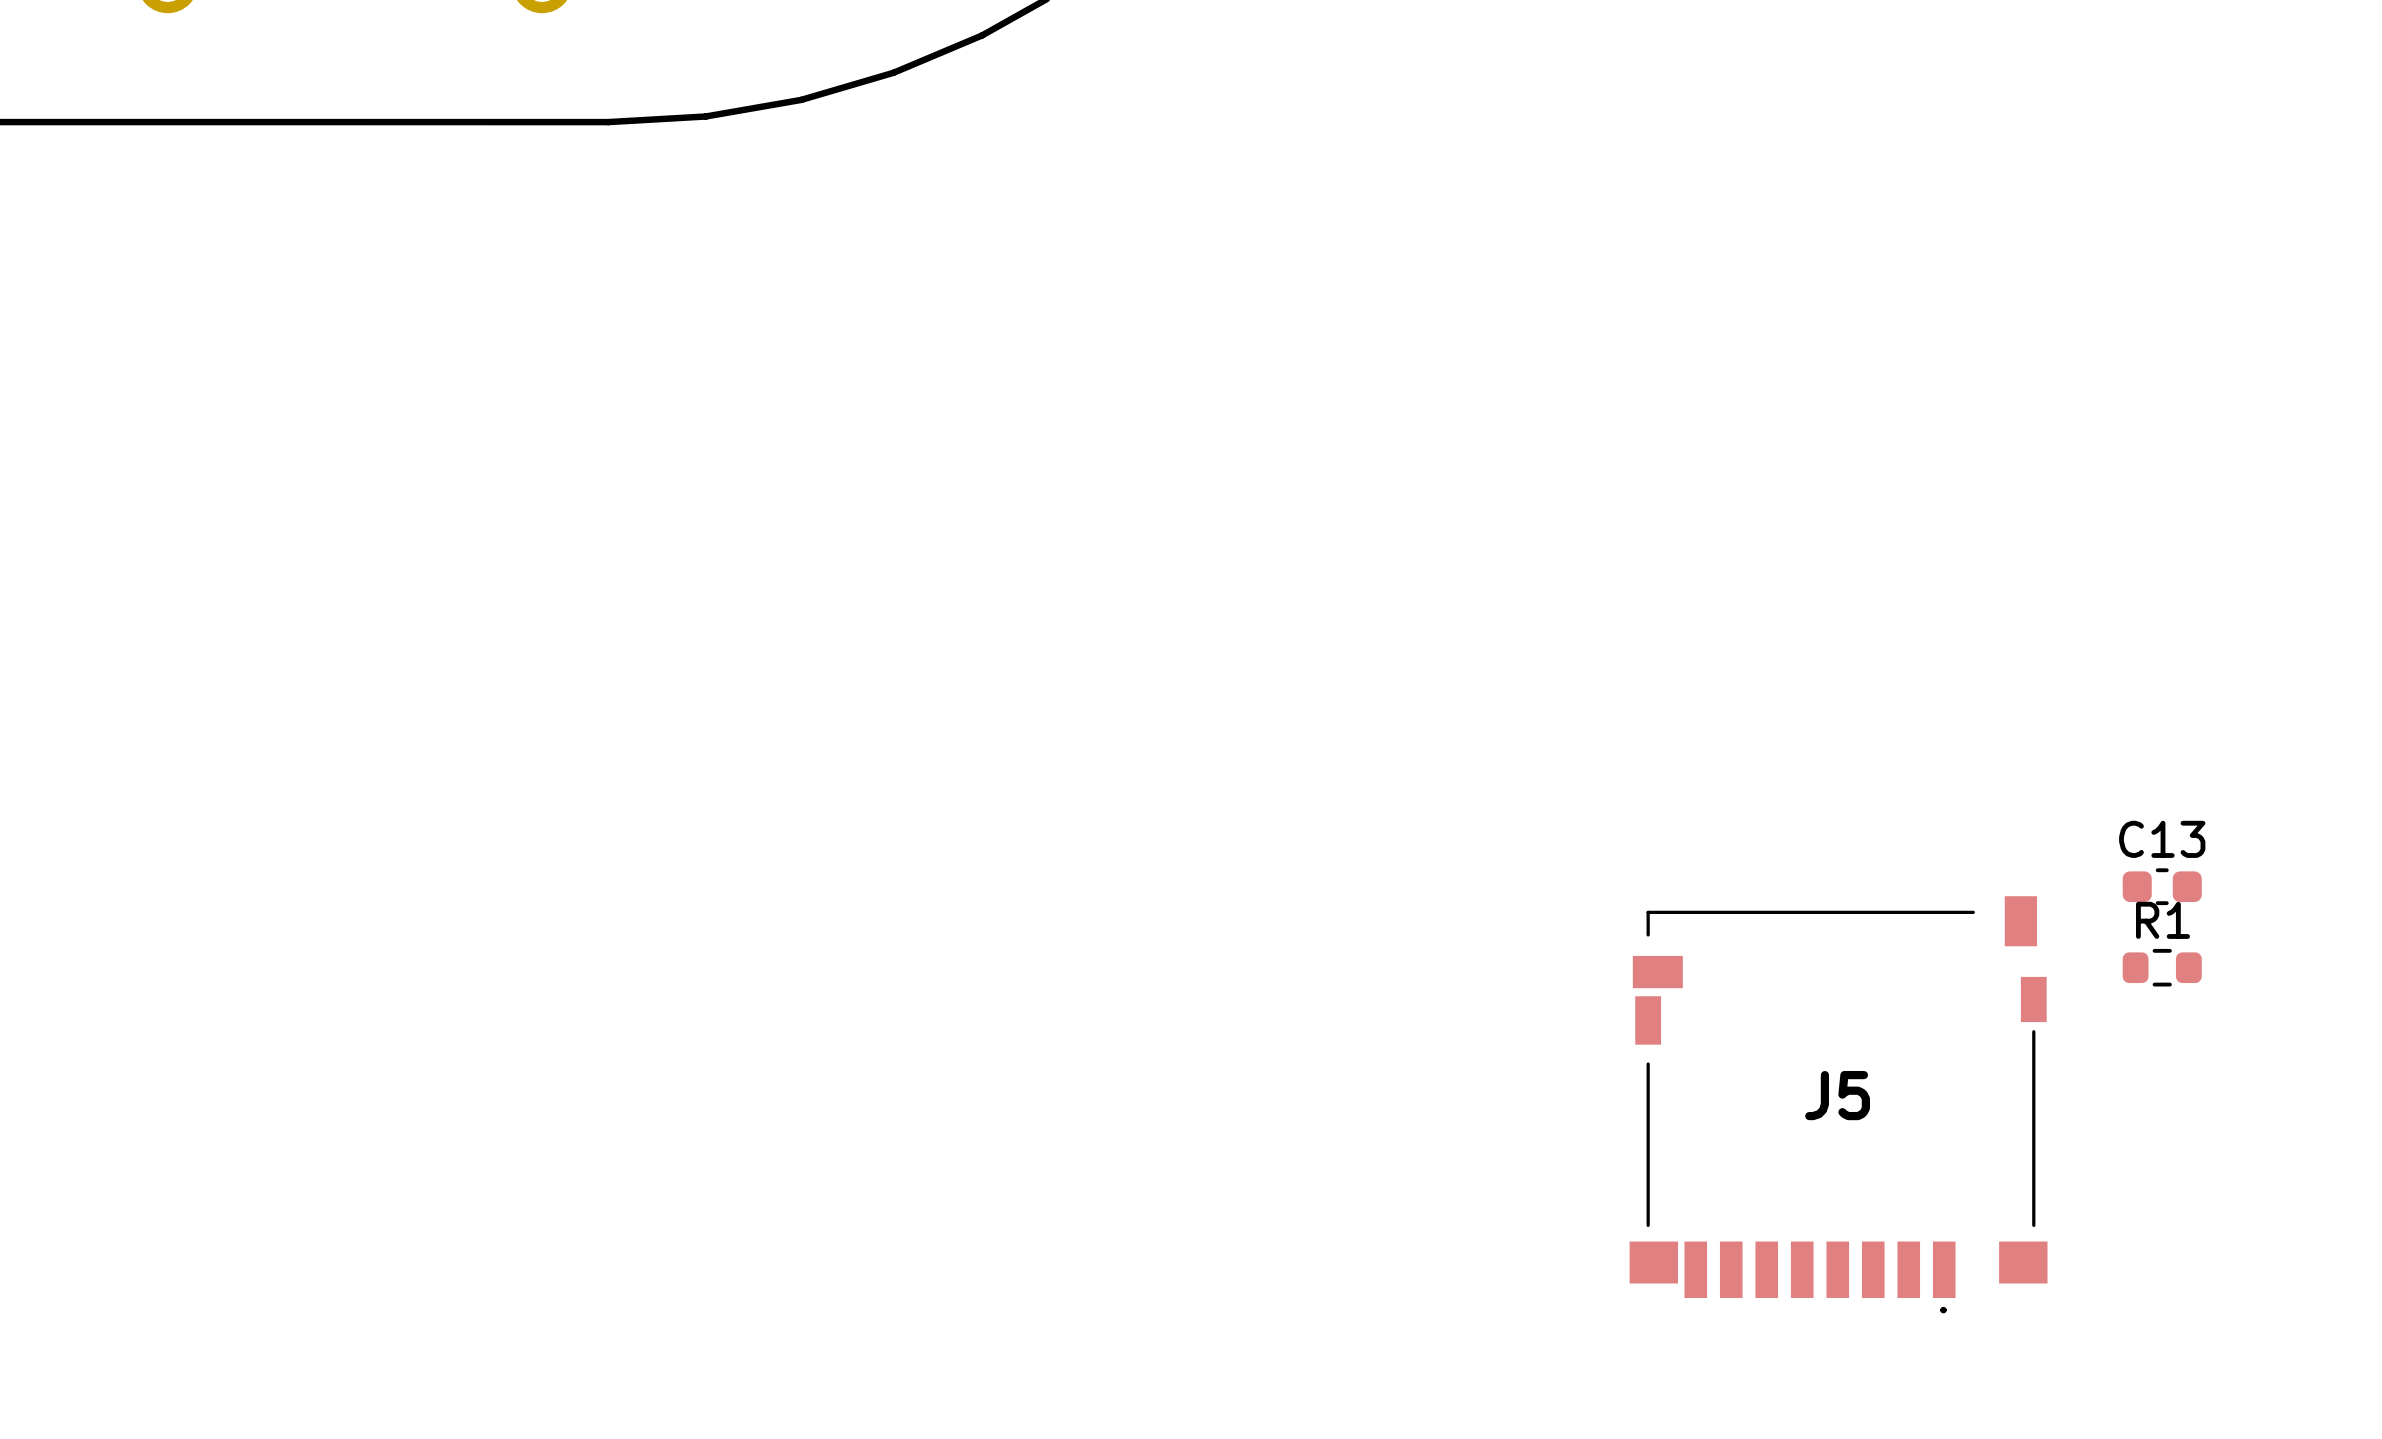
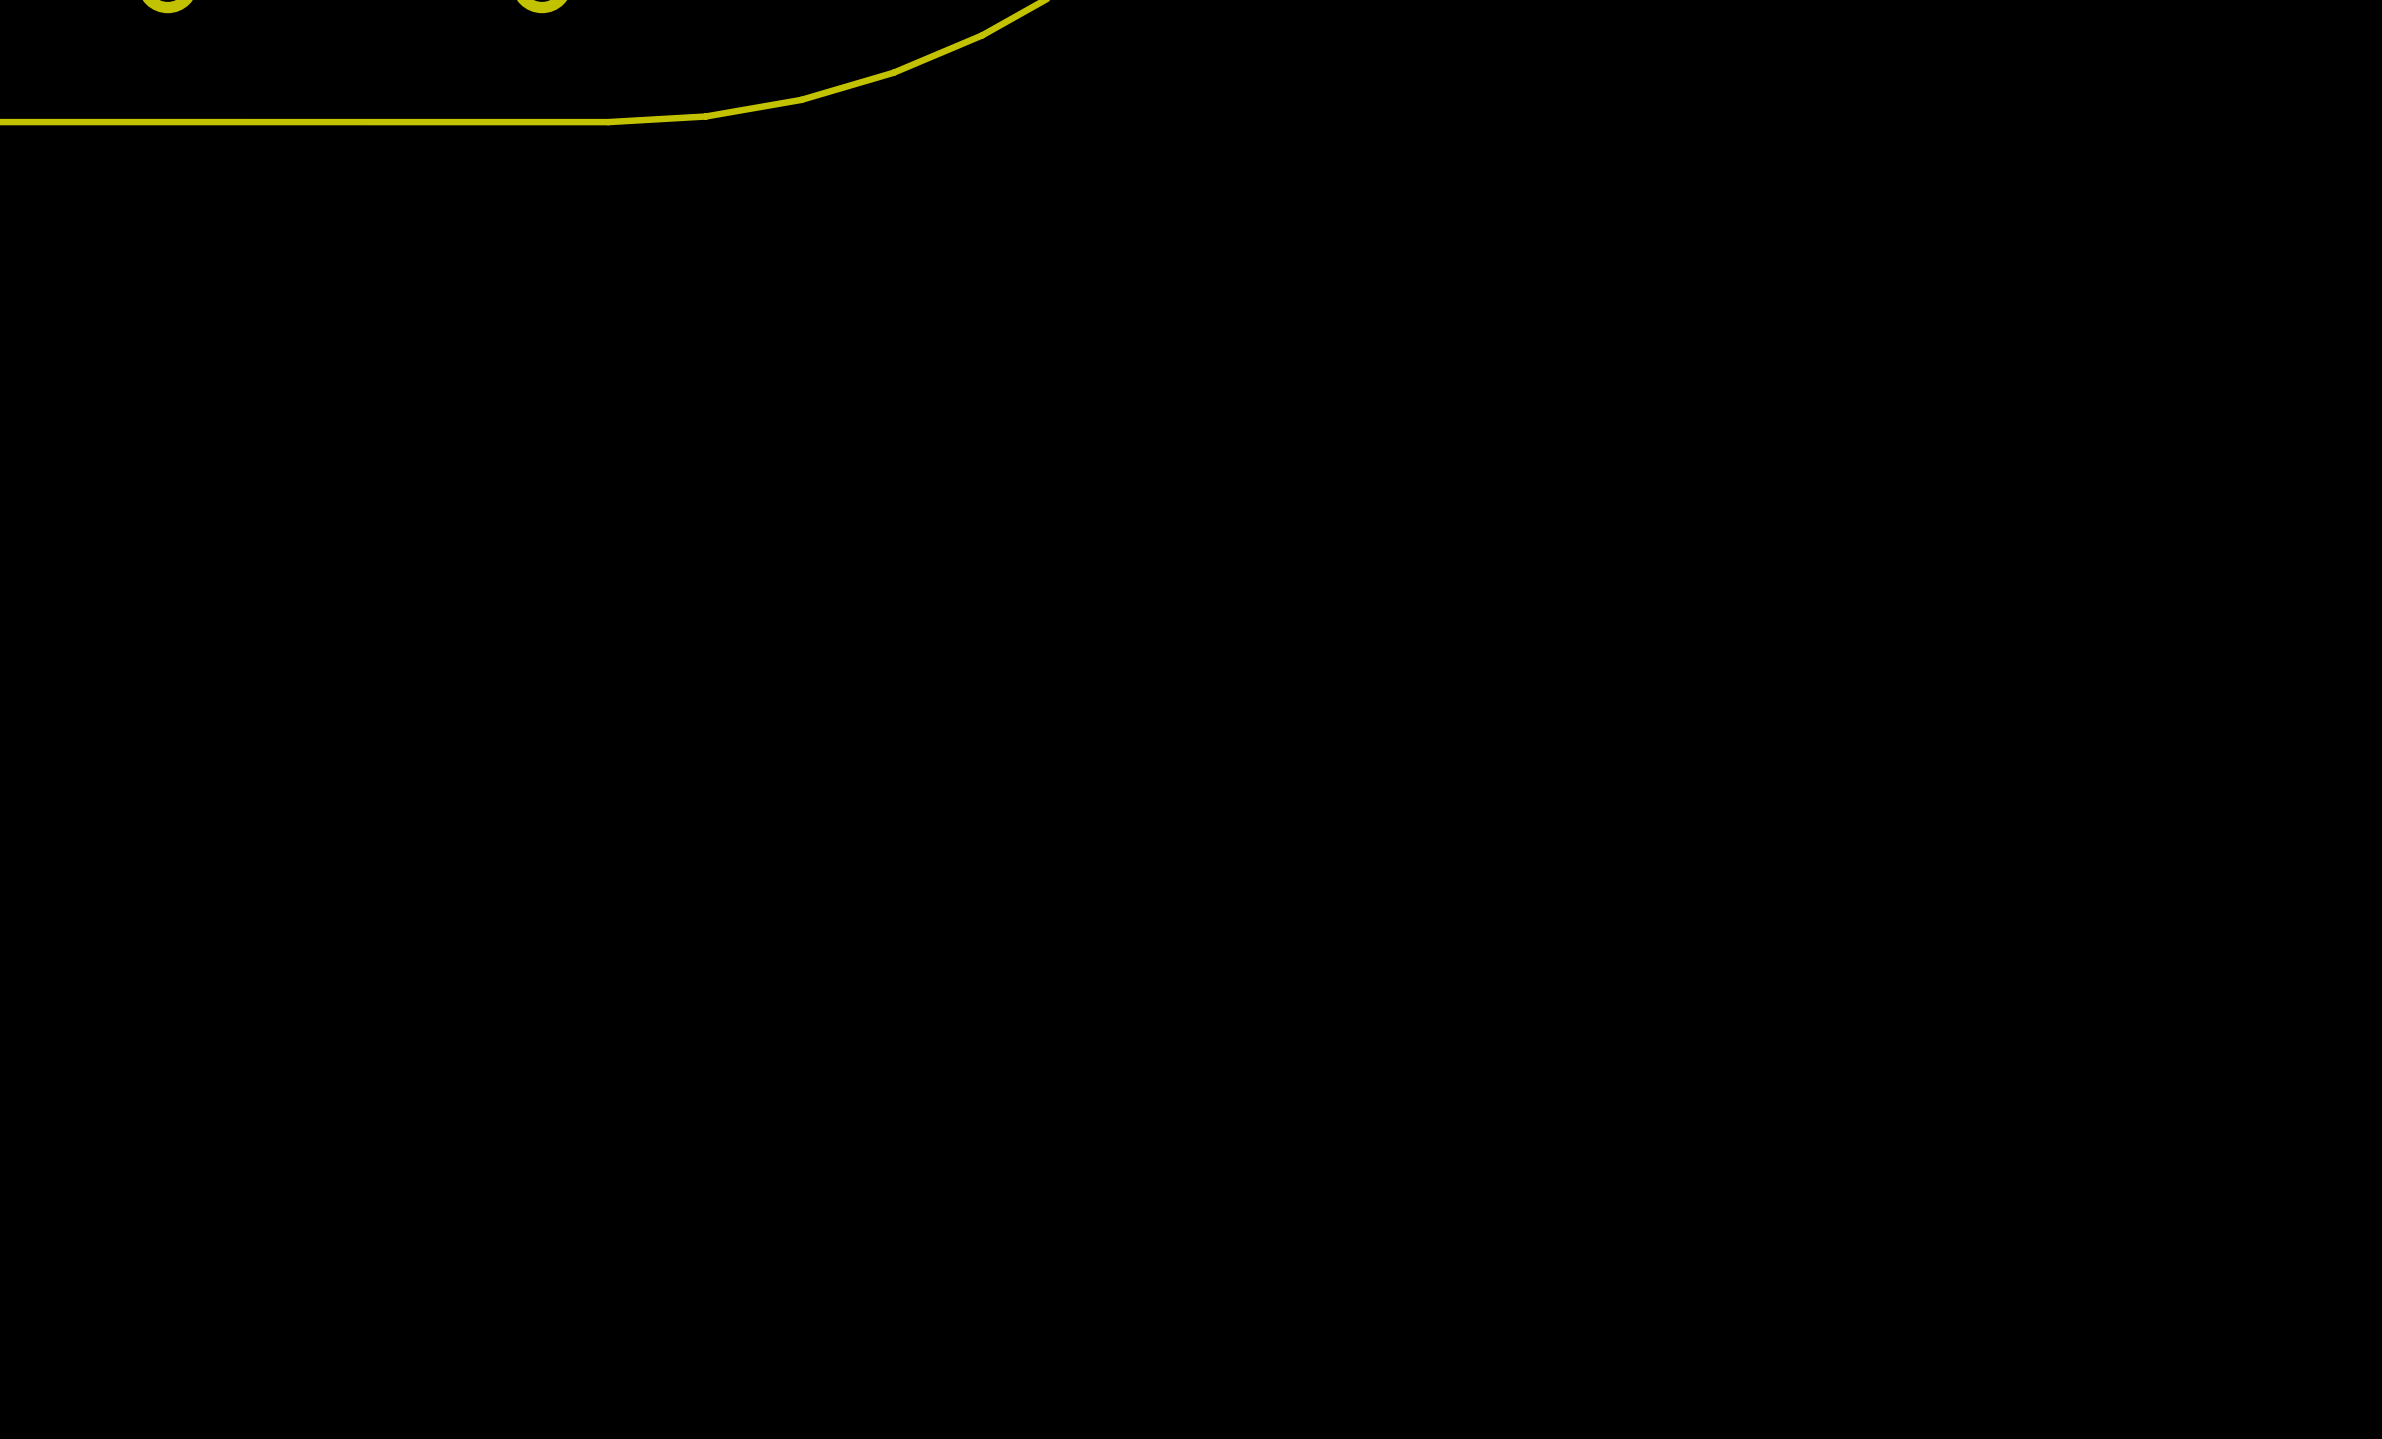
C13: (2162, 886) -> none
R1: (2162, 967) -> none
J5: (1838, 1104) -> none

